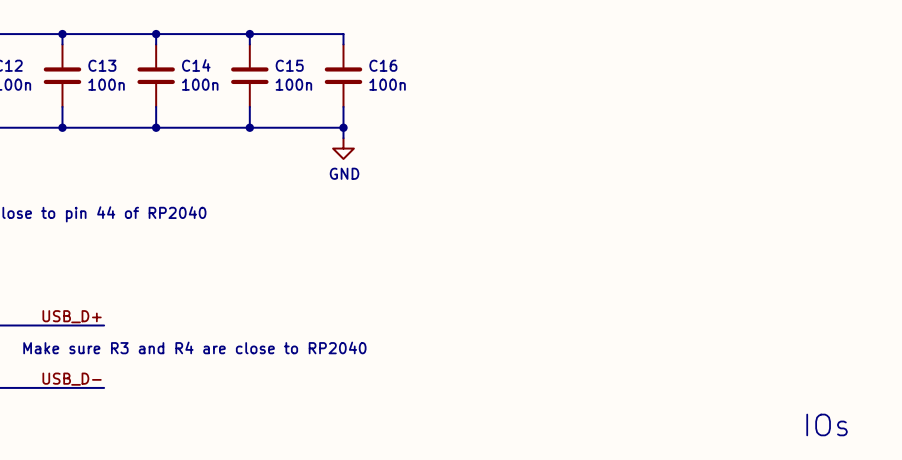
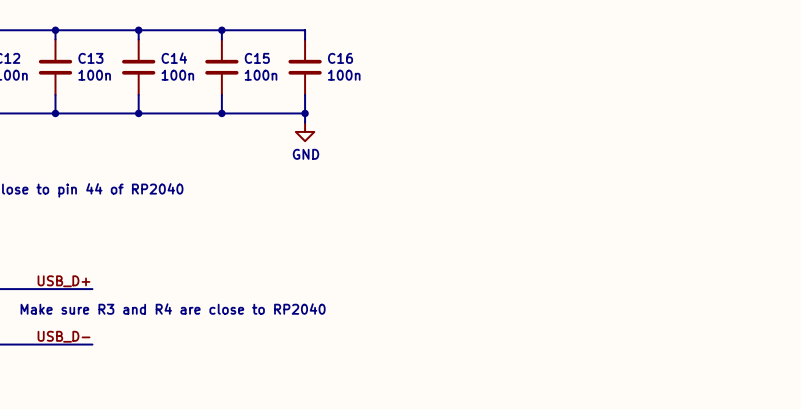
text: IOs (827, 424) -> none

